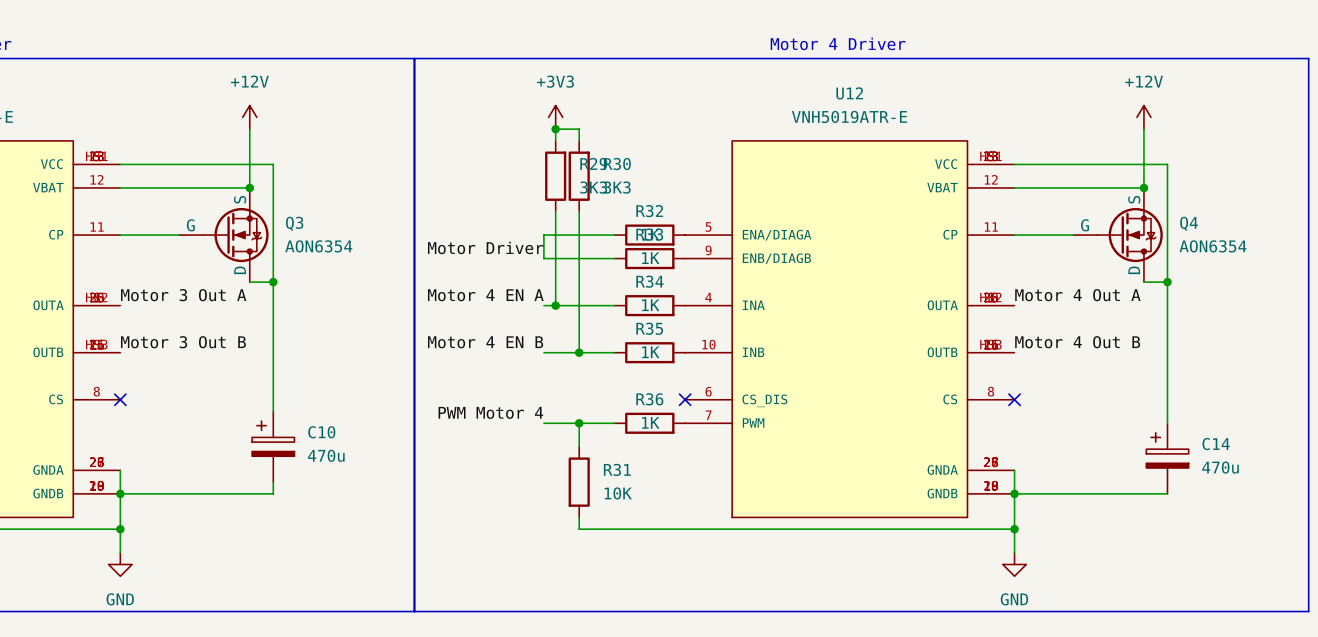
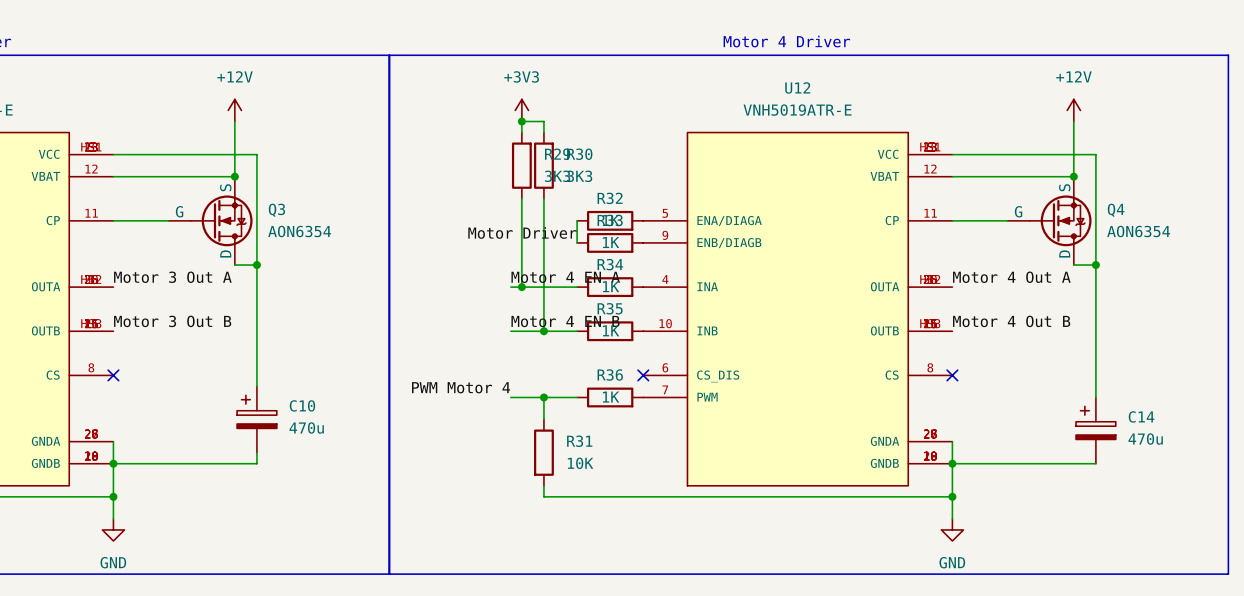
wire: (614, 235) (543, 235) (543, 258) (614, 258) -> (577, 220) (577, 242)
label position: Motor Driver (485, 247) -> Motor Driver (522, 232)
label position: Motor 4 EN A (485, 295) -> Motor 4 EN A (565, 277)
label position: Motor 4 EN B (485, 342) -> Motor 4 EN B (565, 321)

